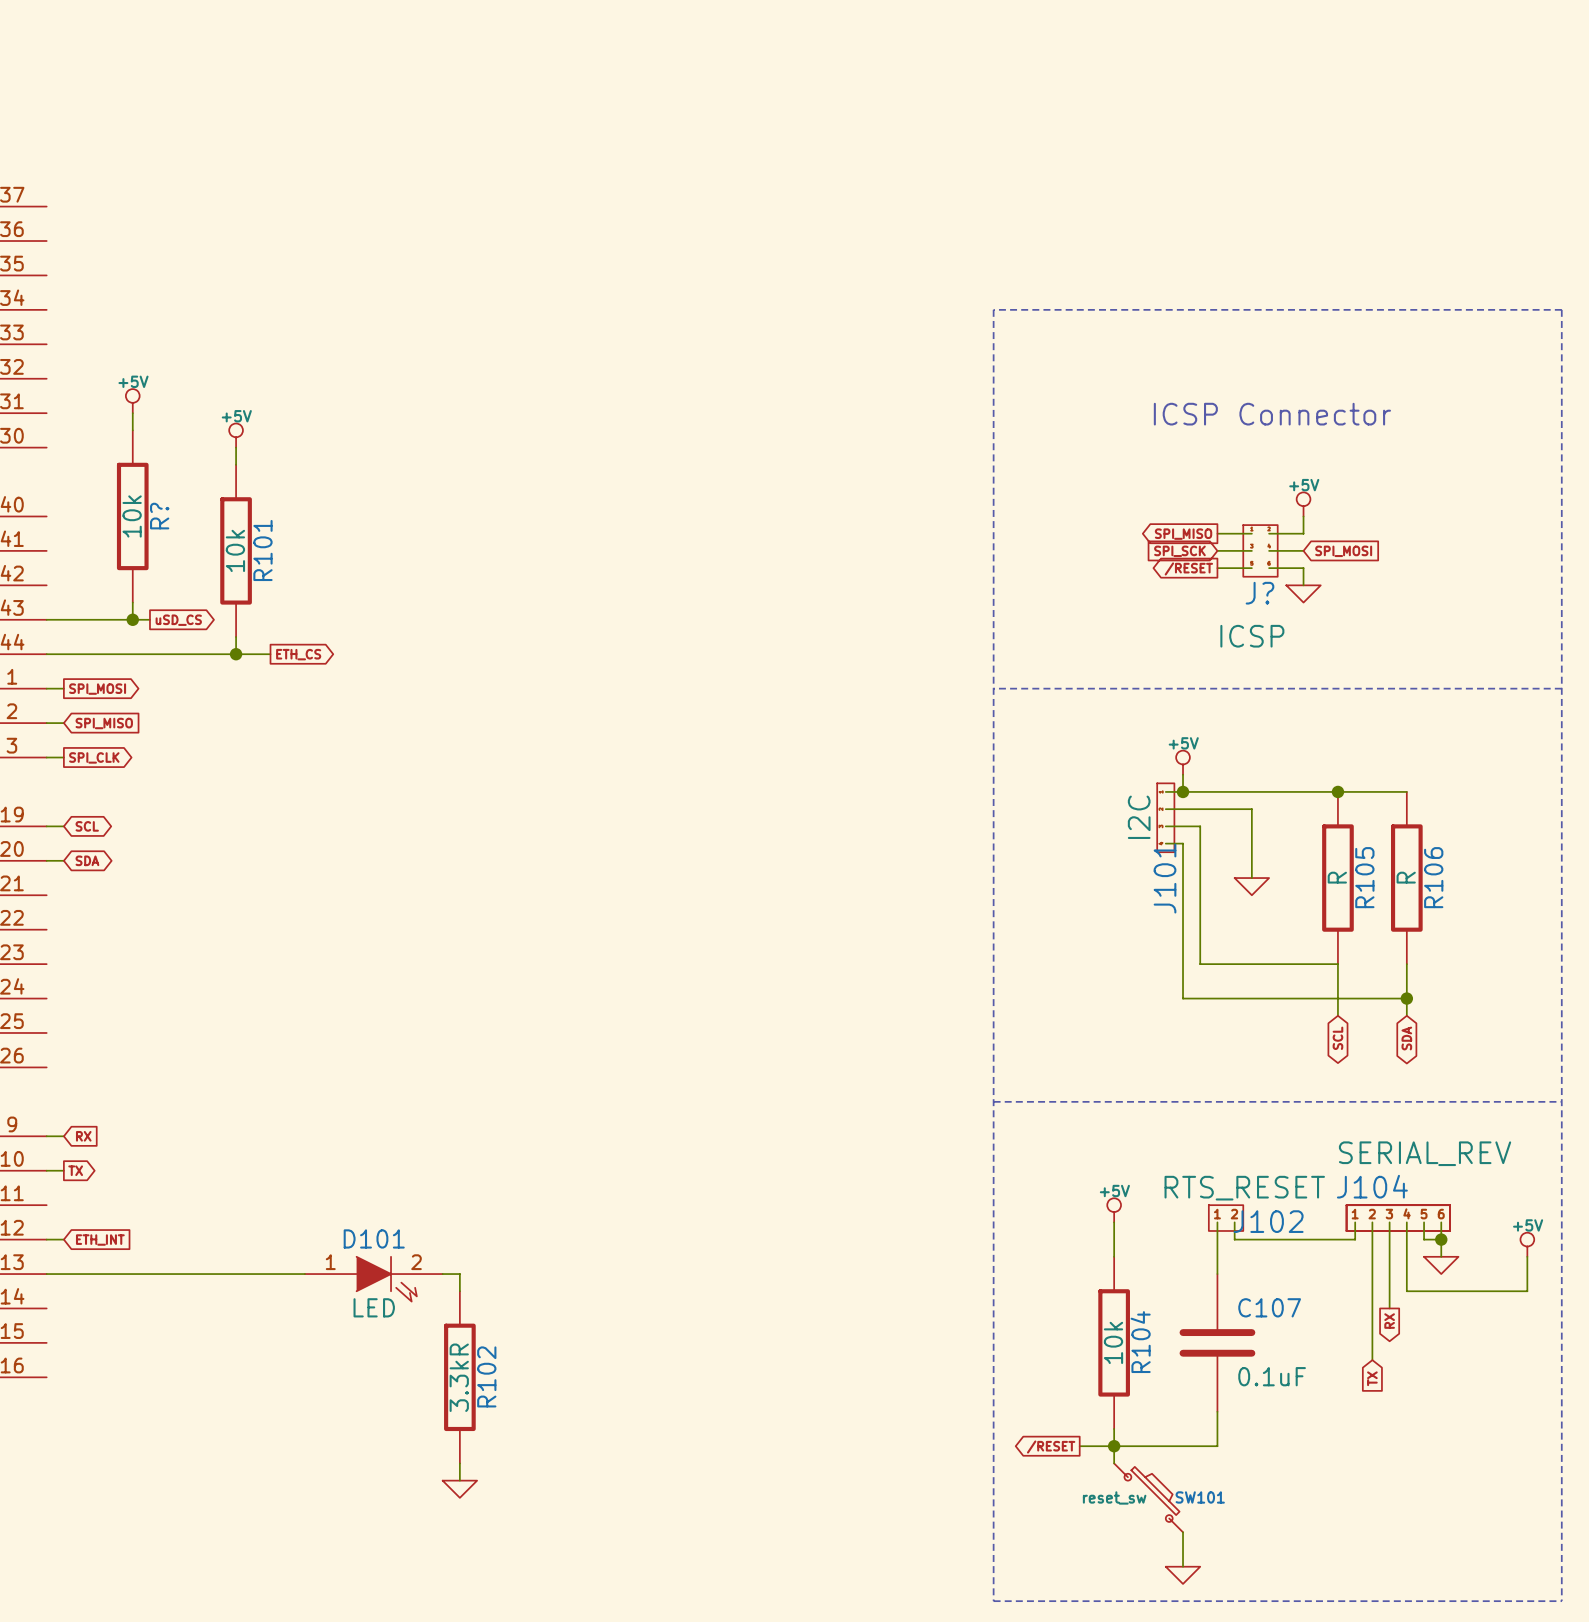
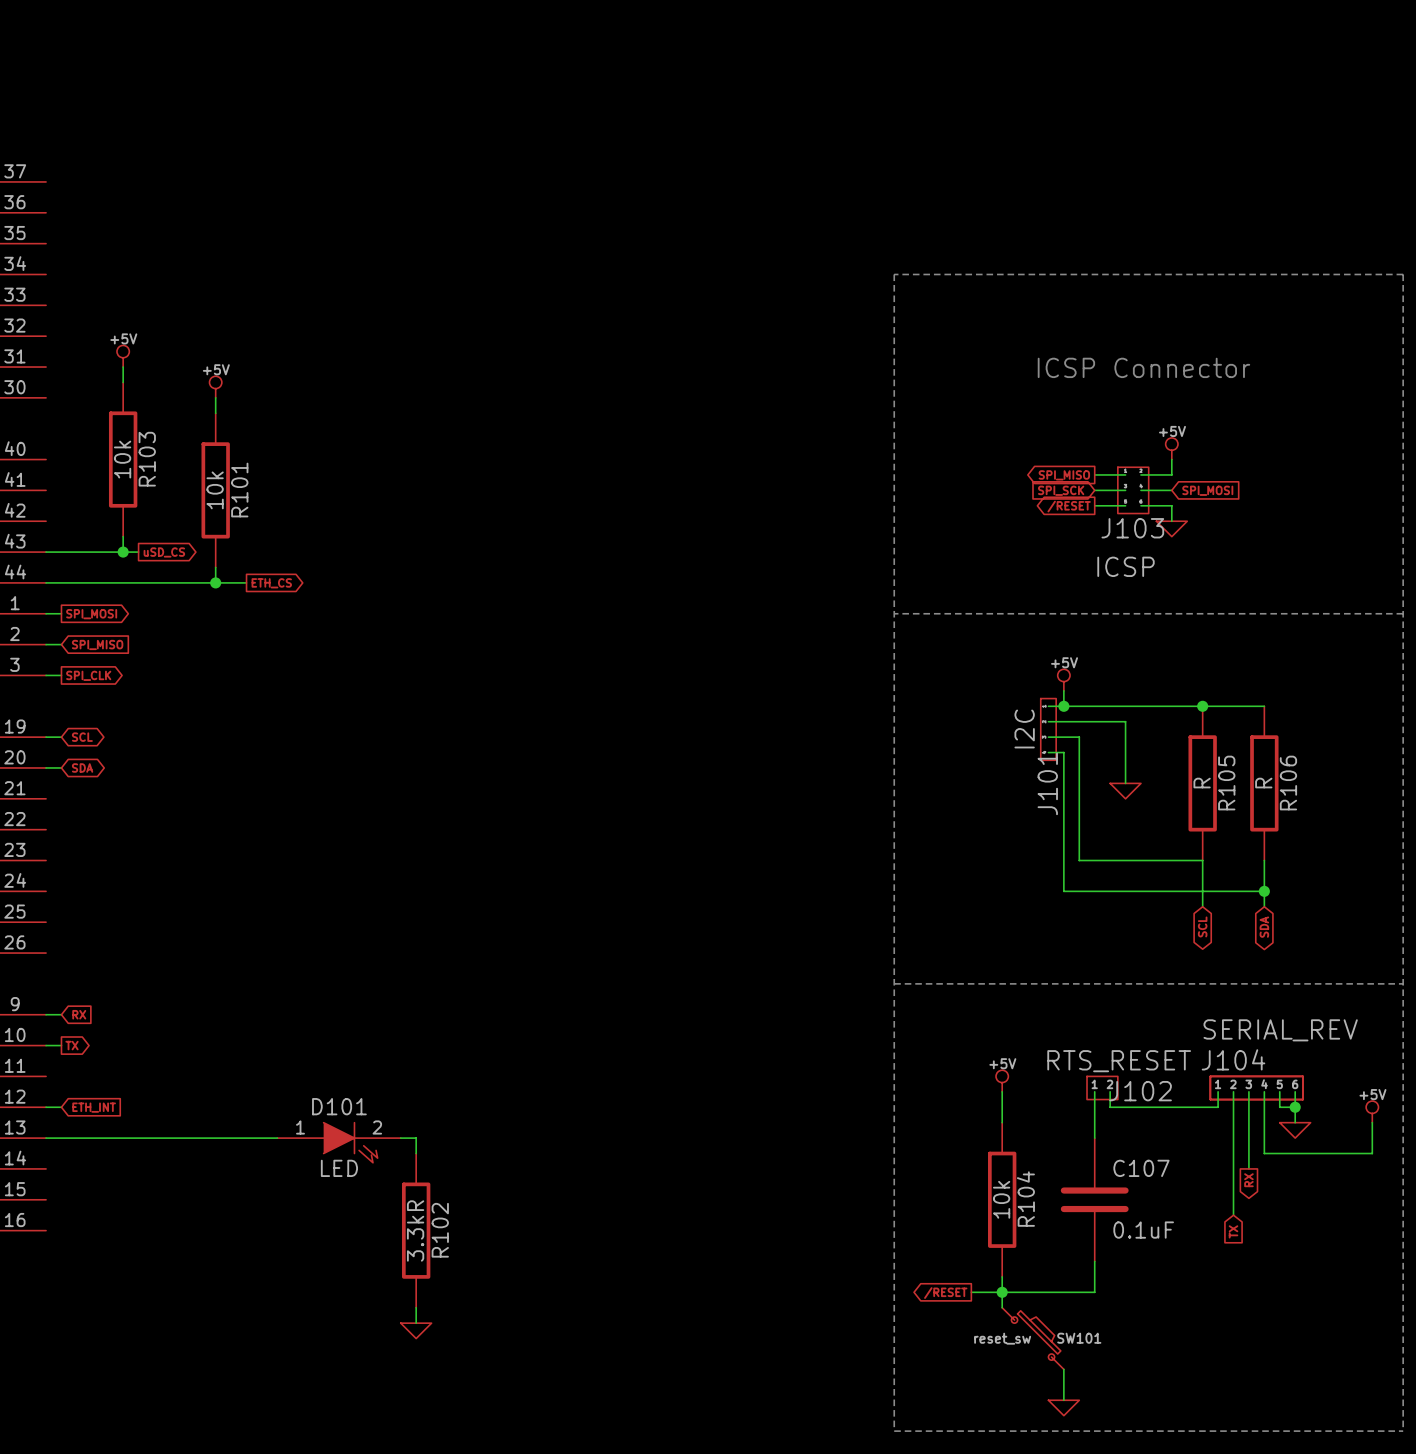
R? name: R? (159, 516) -> R103 (147, 459)
J? name: J? (1259, 593) -> J103 (1132, 528)

